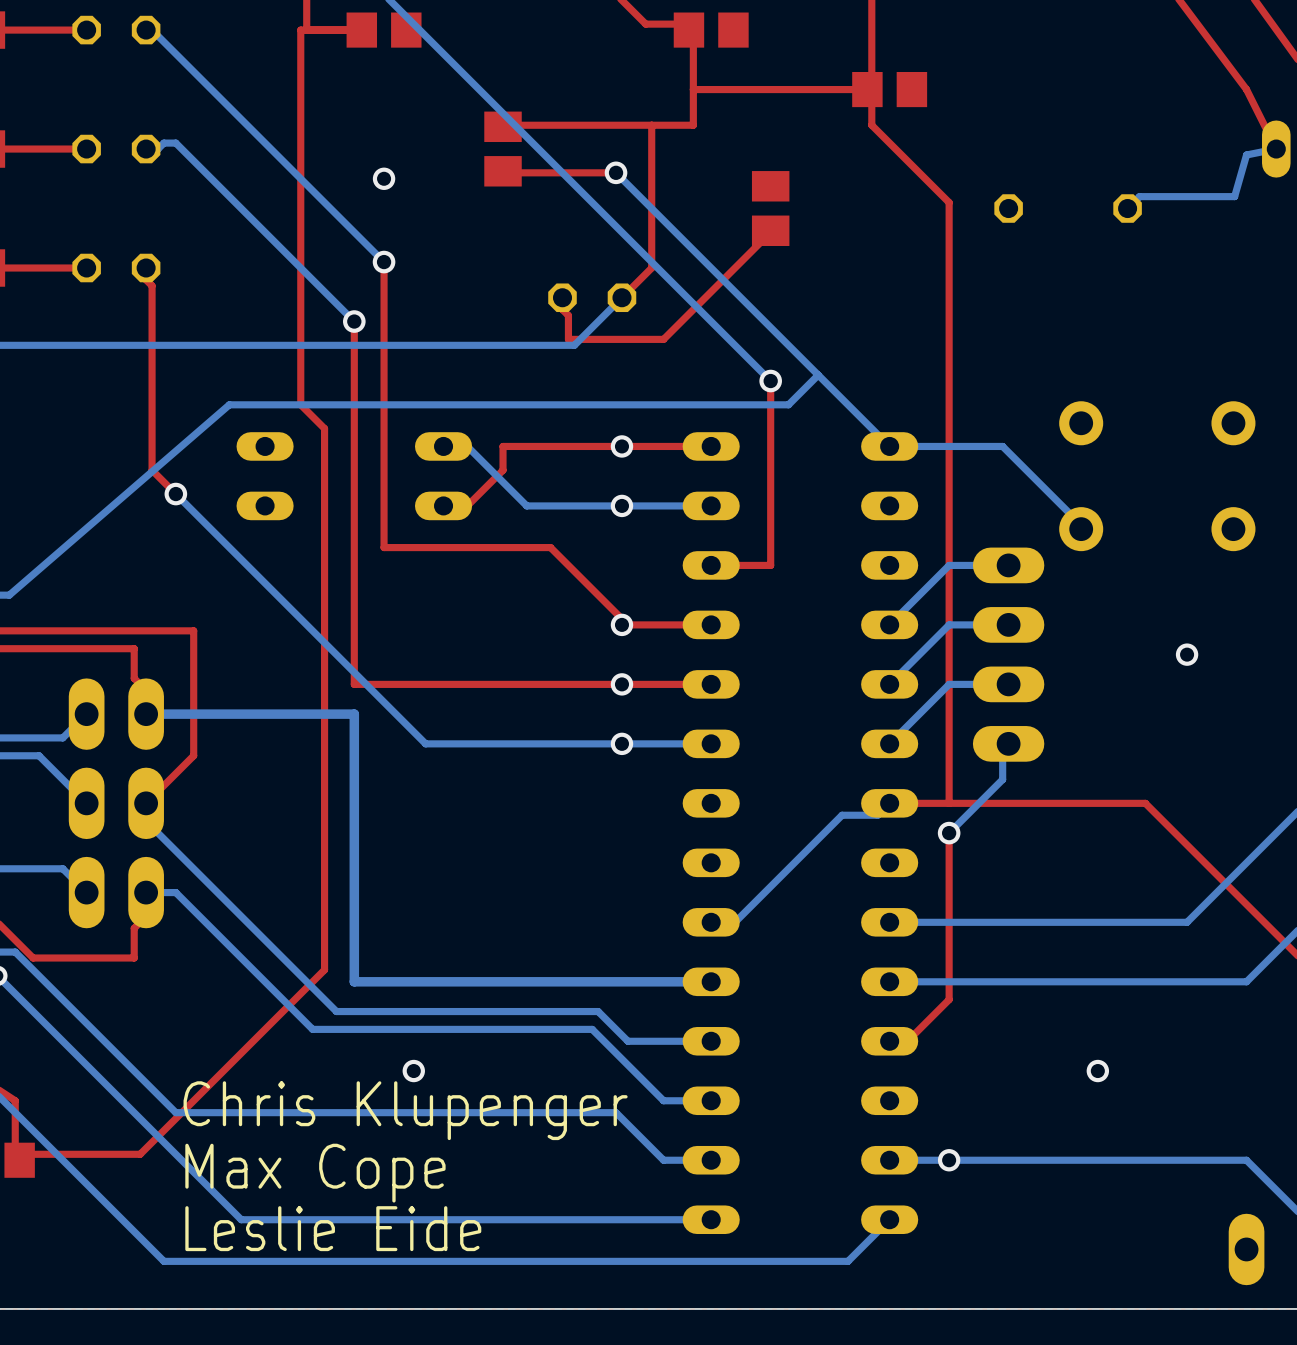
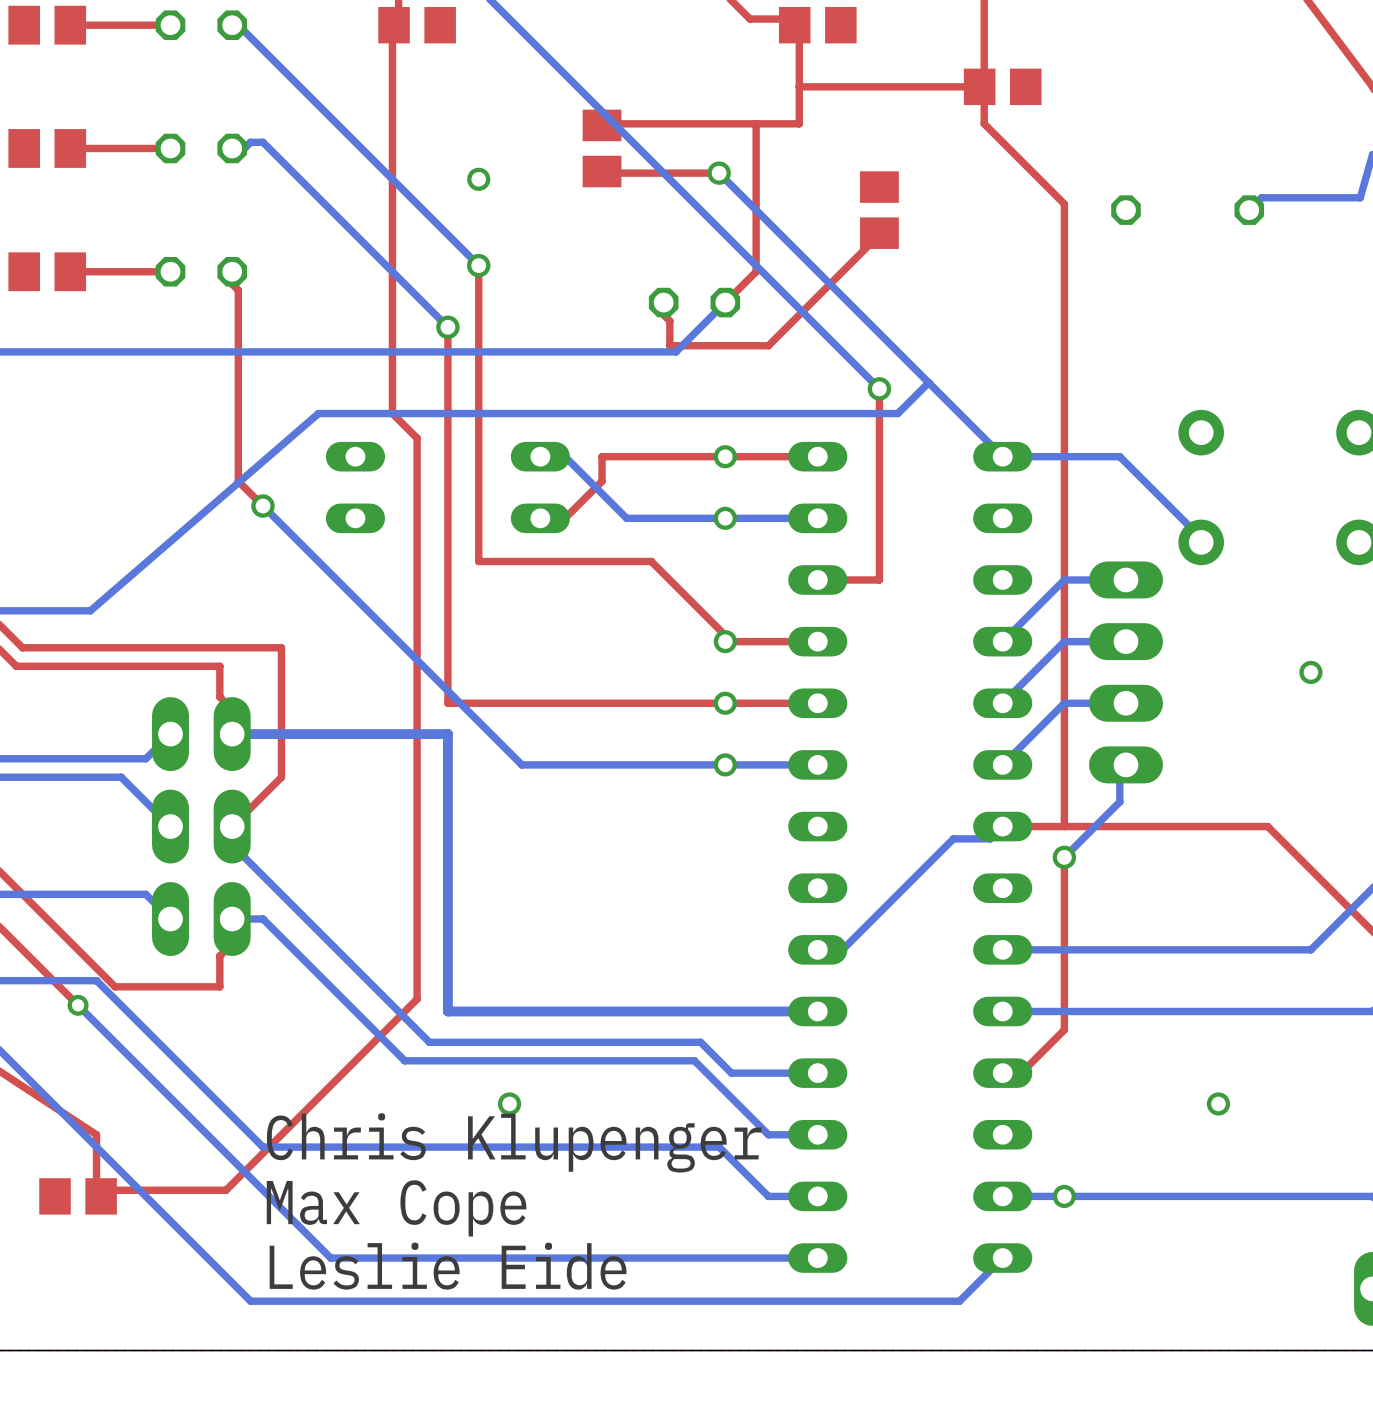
top track: (361, 30) (306, 30) -> none
part position: (384, 30) -> (417, 25)

